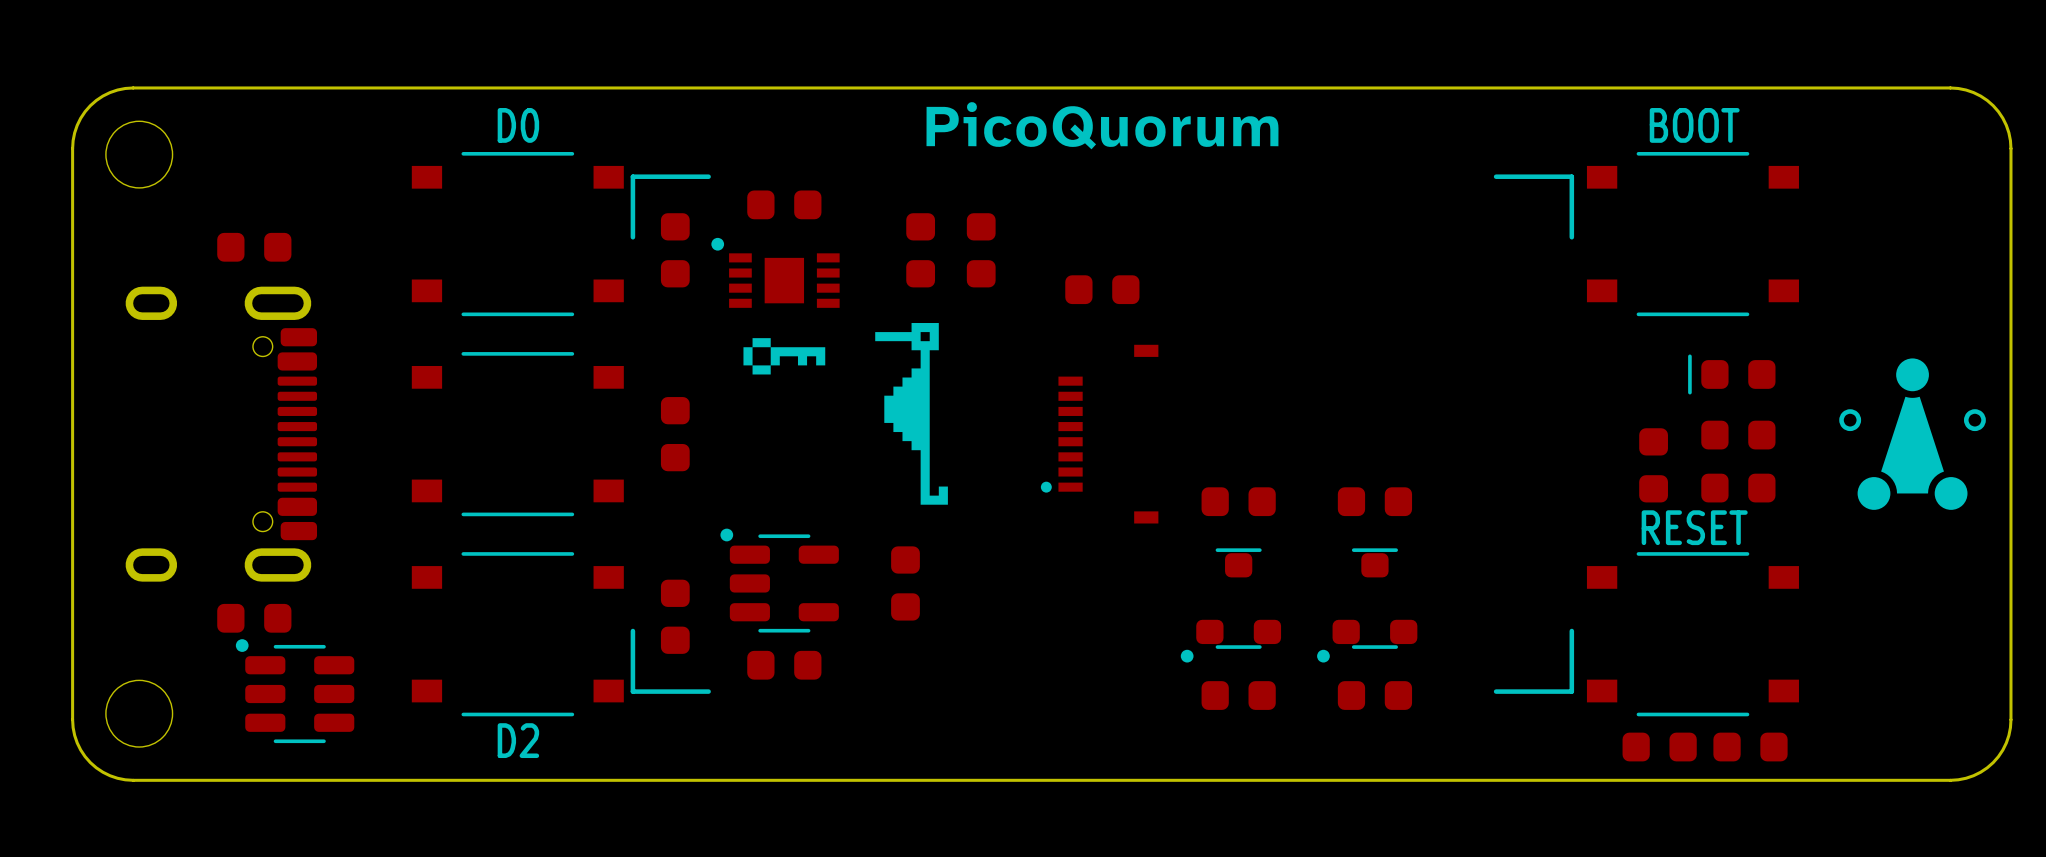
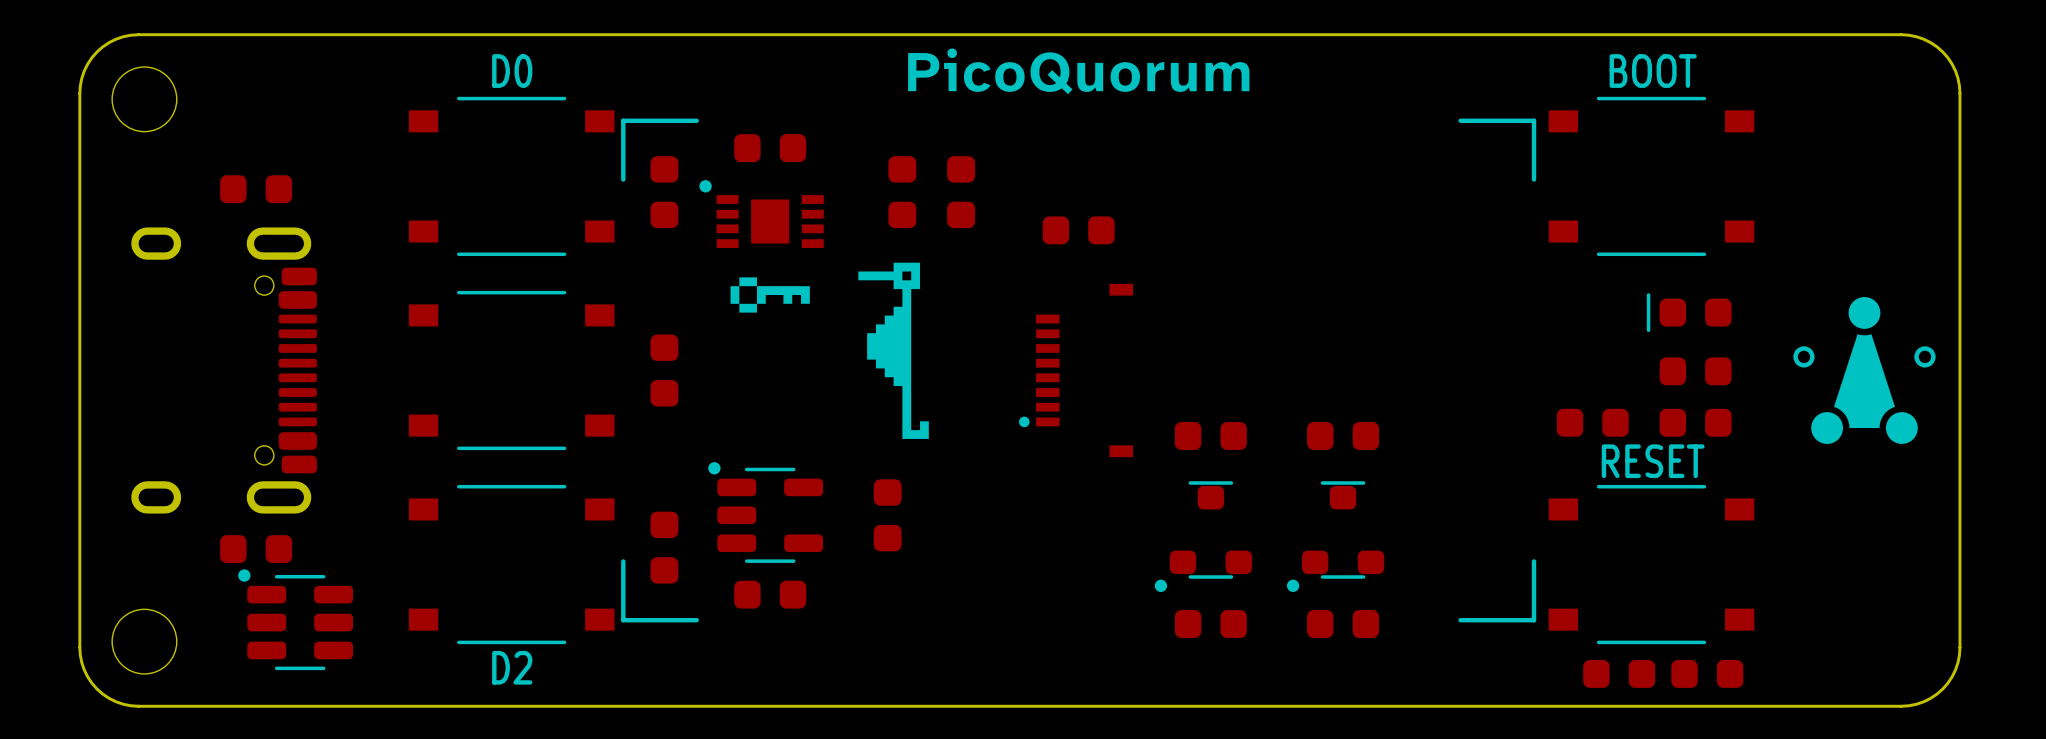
part rotation: 0° (1653, 465) -> 90° clockwise (1592, 422)

